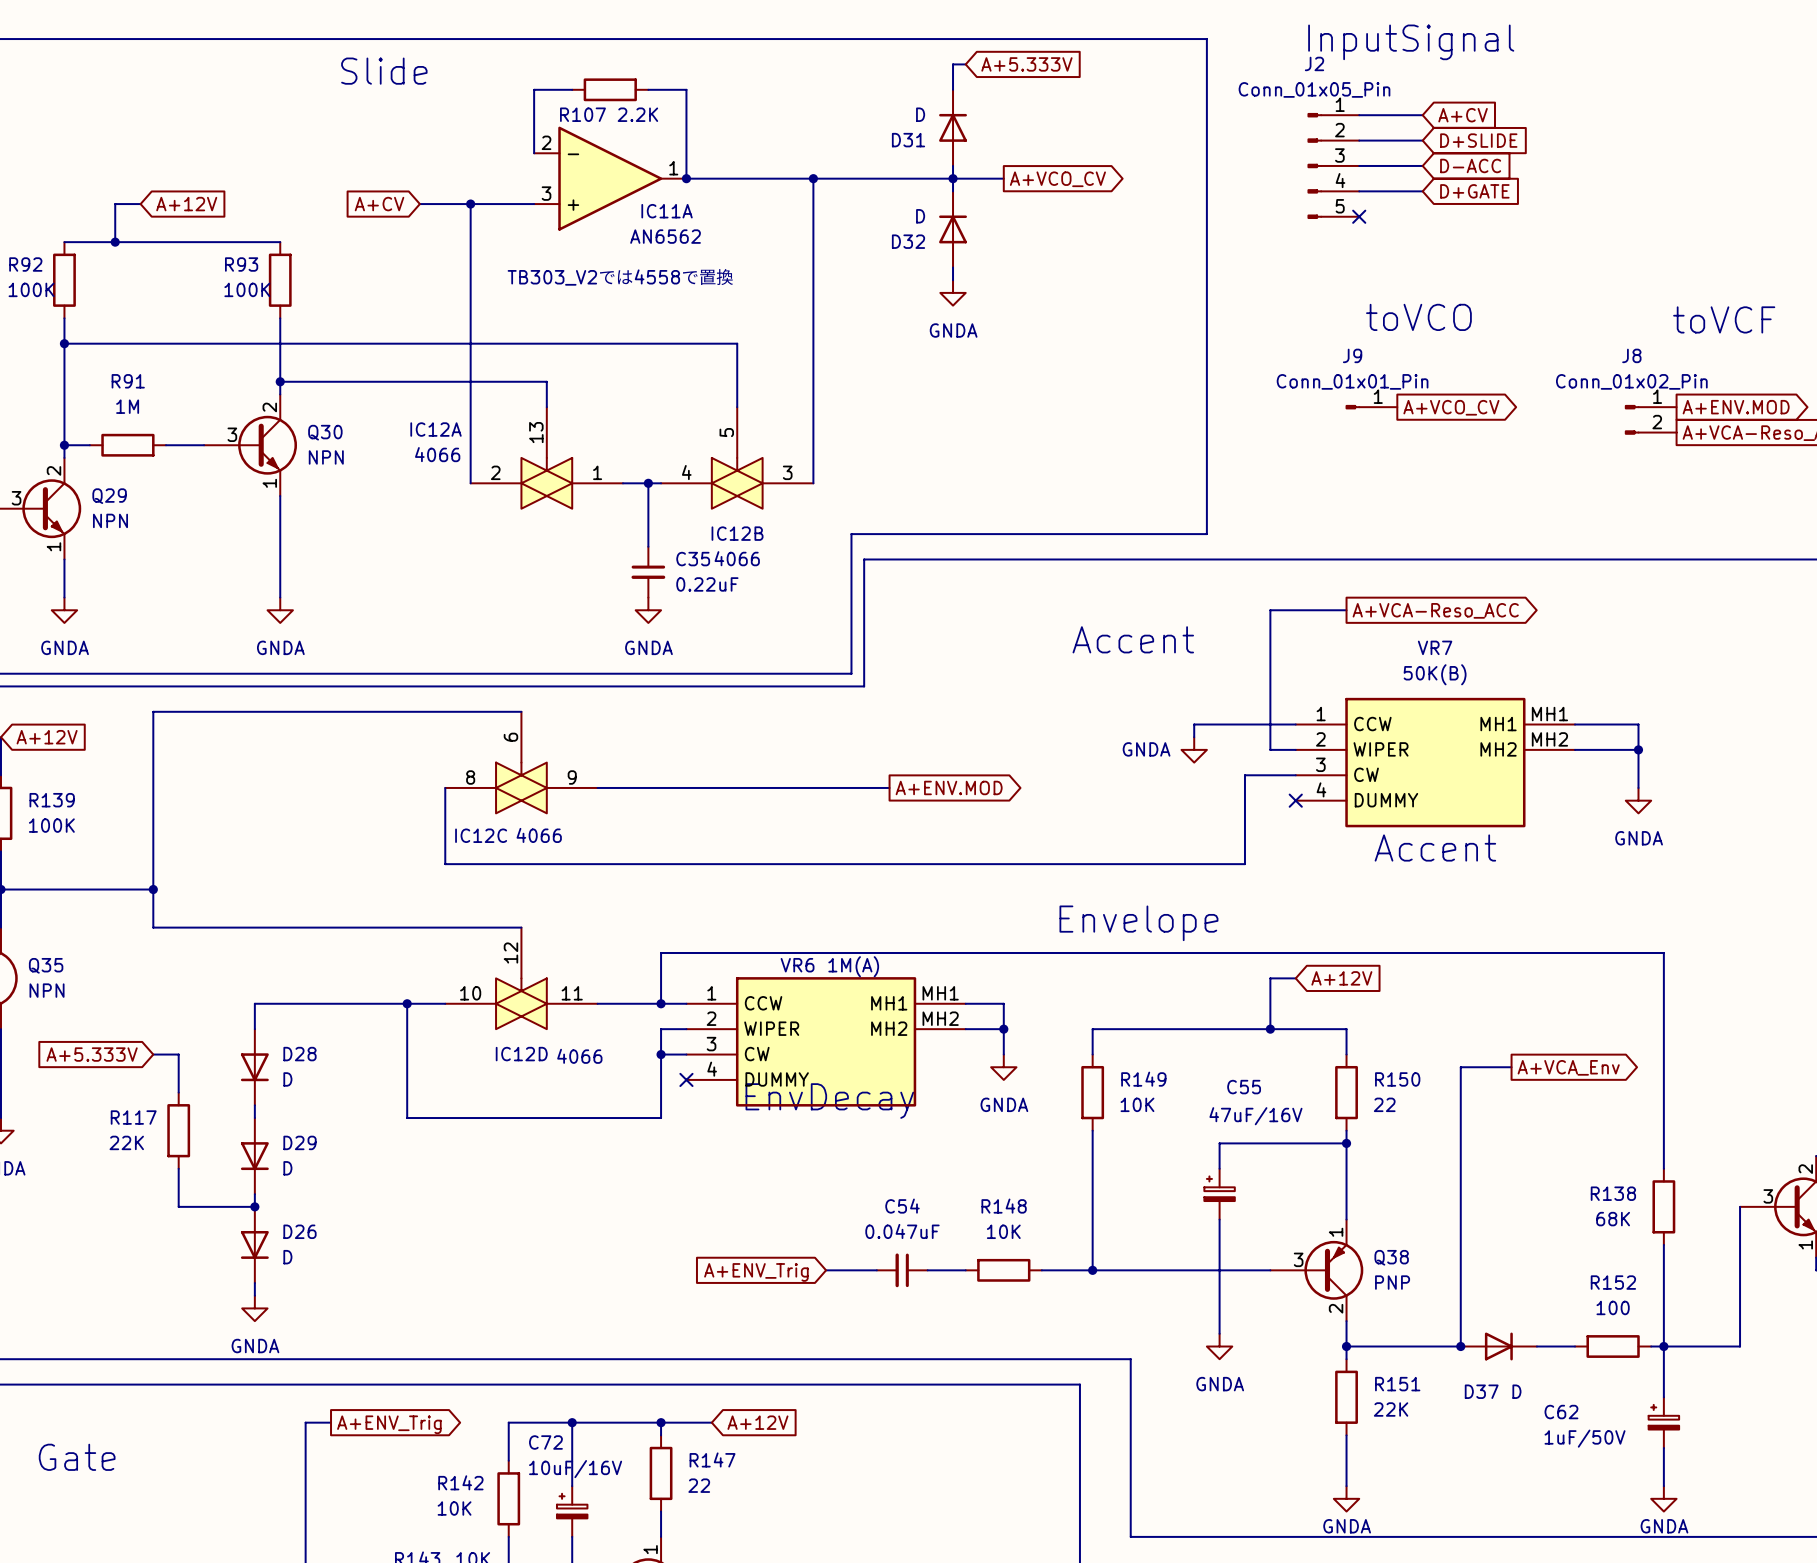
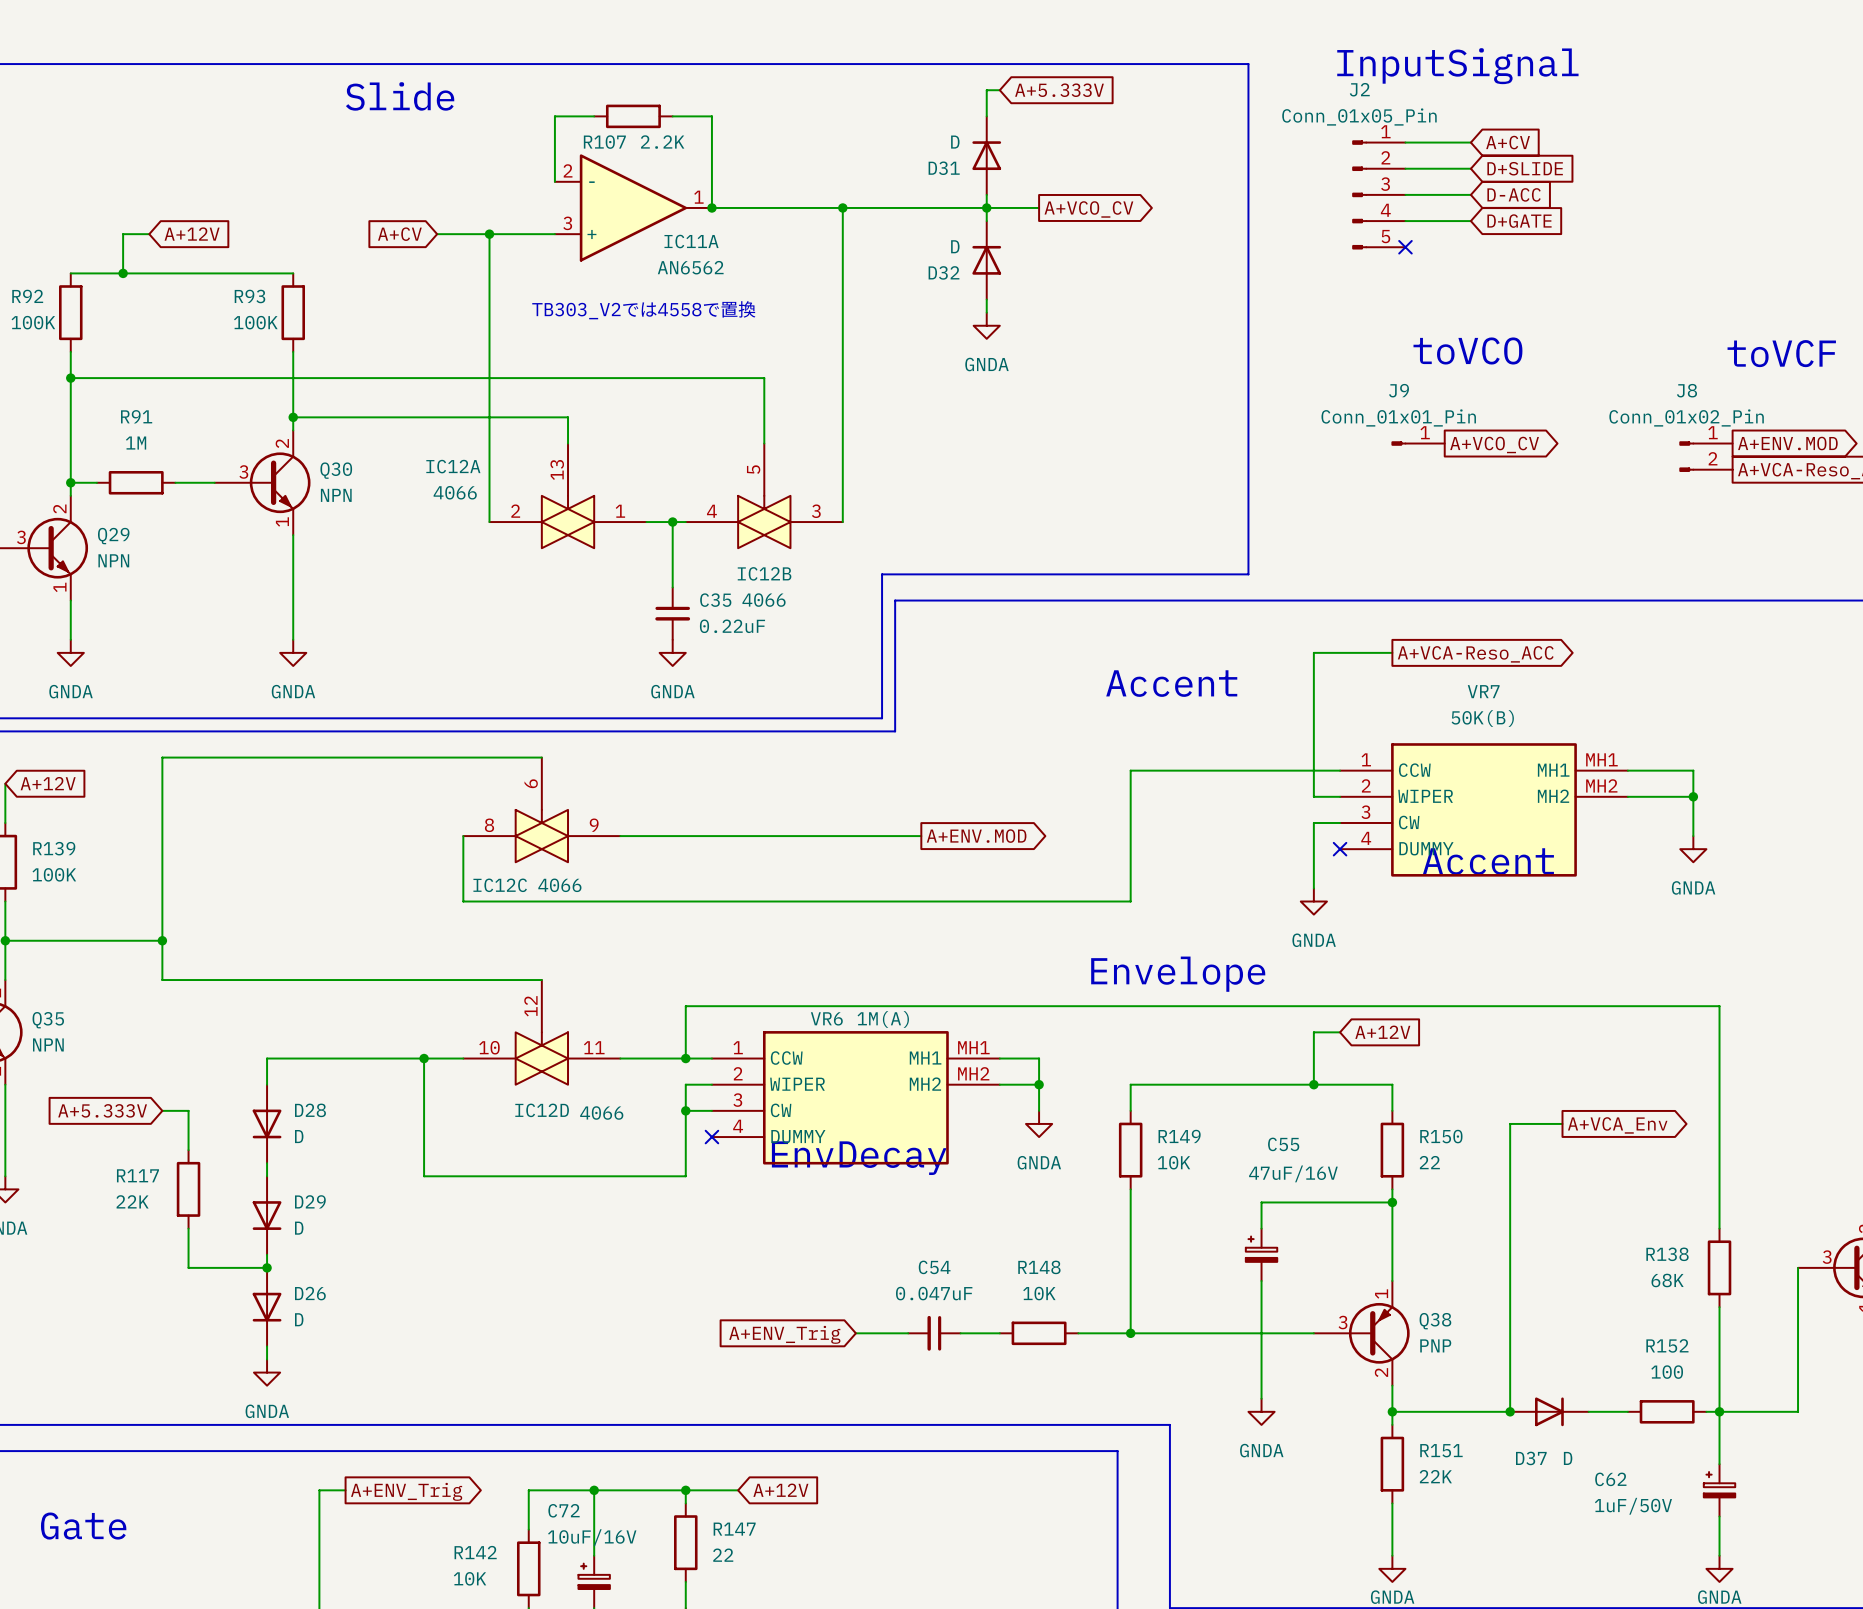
wire: (1194, 724) (1194, 737) -> none
power symbol text position: GNDA (1146, 749) -> GNDA (1314, 940)
power symbol position: GNDA (1194, 749) -> GNDA (1313, 901)
wire: (1270, 775) (1244, 775) (1244, 864) (445, 864) (445, 851) -> (1235, 770) (1130, 770) (1130, 901) (463, 901)
wire: none -> (1313, 822) (1313, 888)
text position: Accent (1435, 847) -> Accent (1488, 861)

